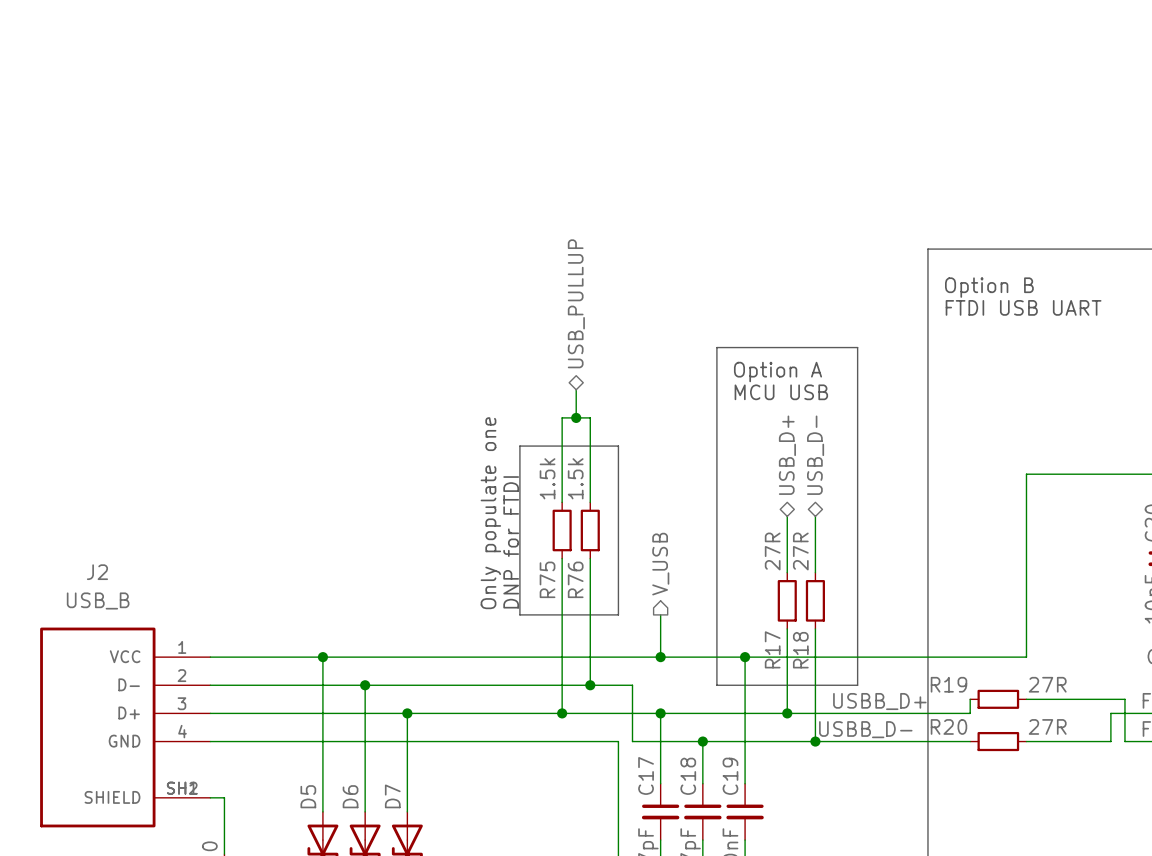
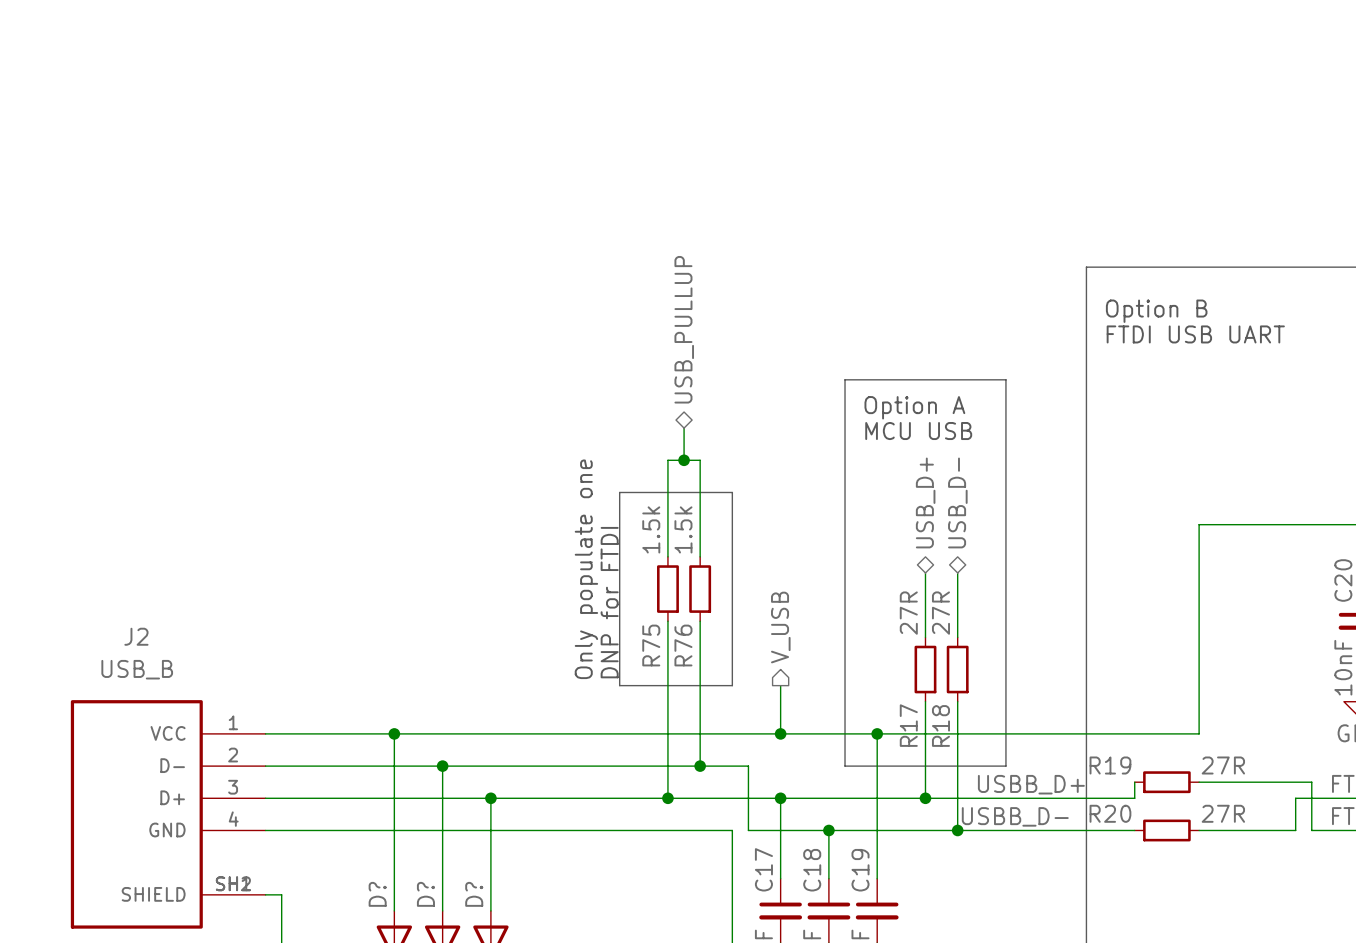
D5 name: D5 (308, 796) -> D? (377, 894)
D6 name: D6 (350, 796) -> D? (425, 894)
D7 name: D7 (392, 796) -> D? (474, 894)

